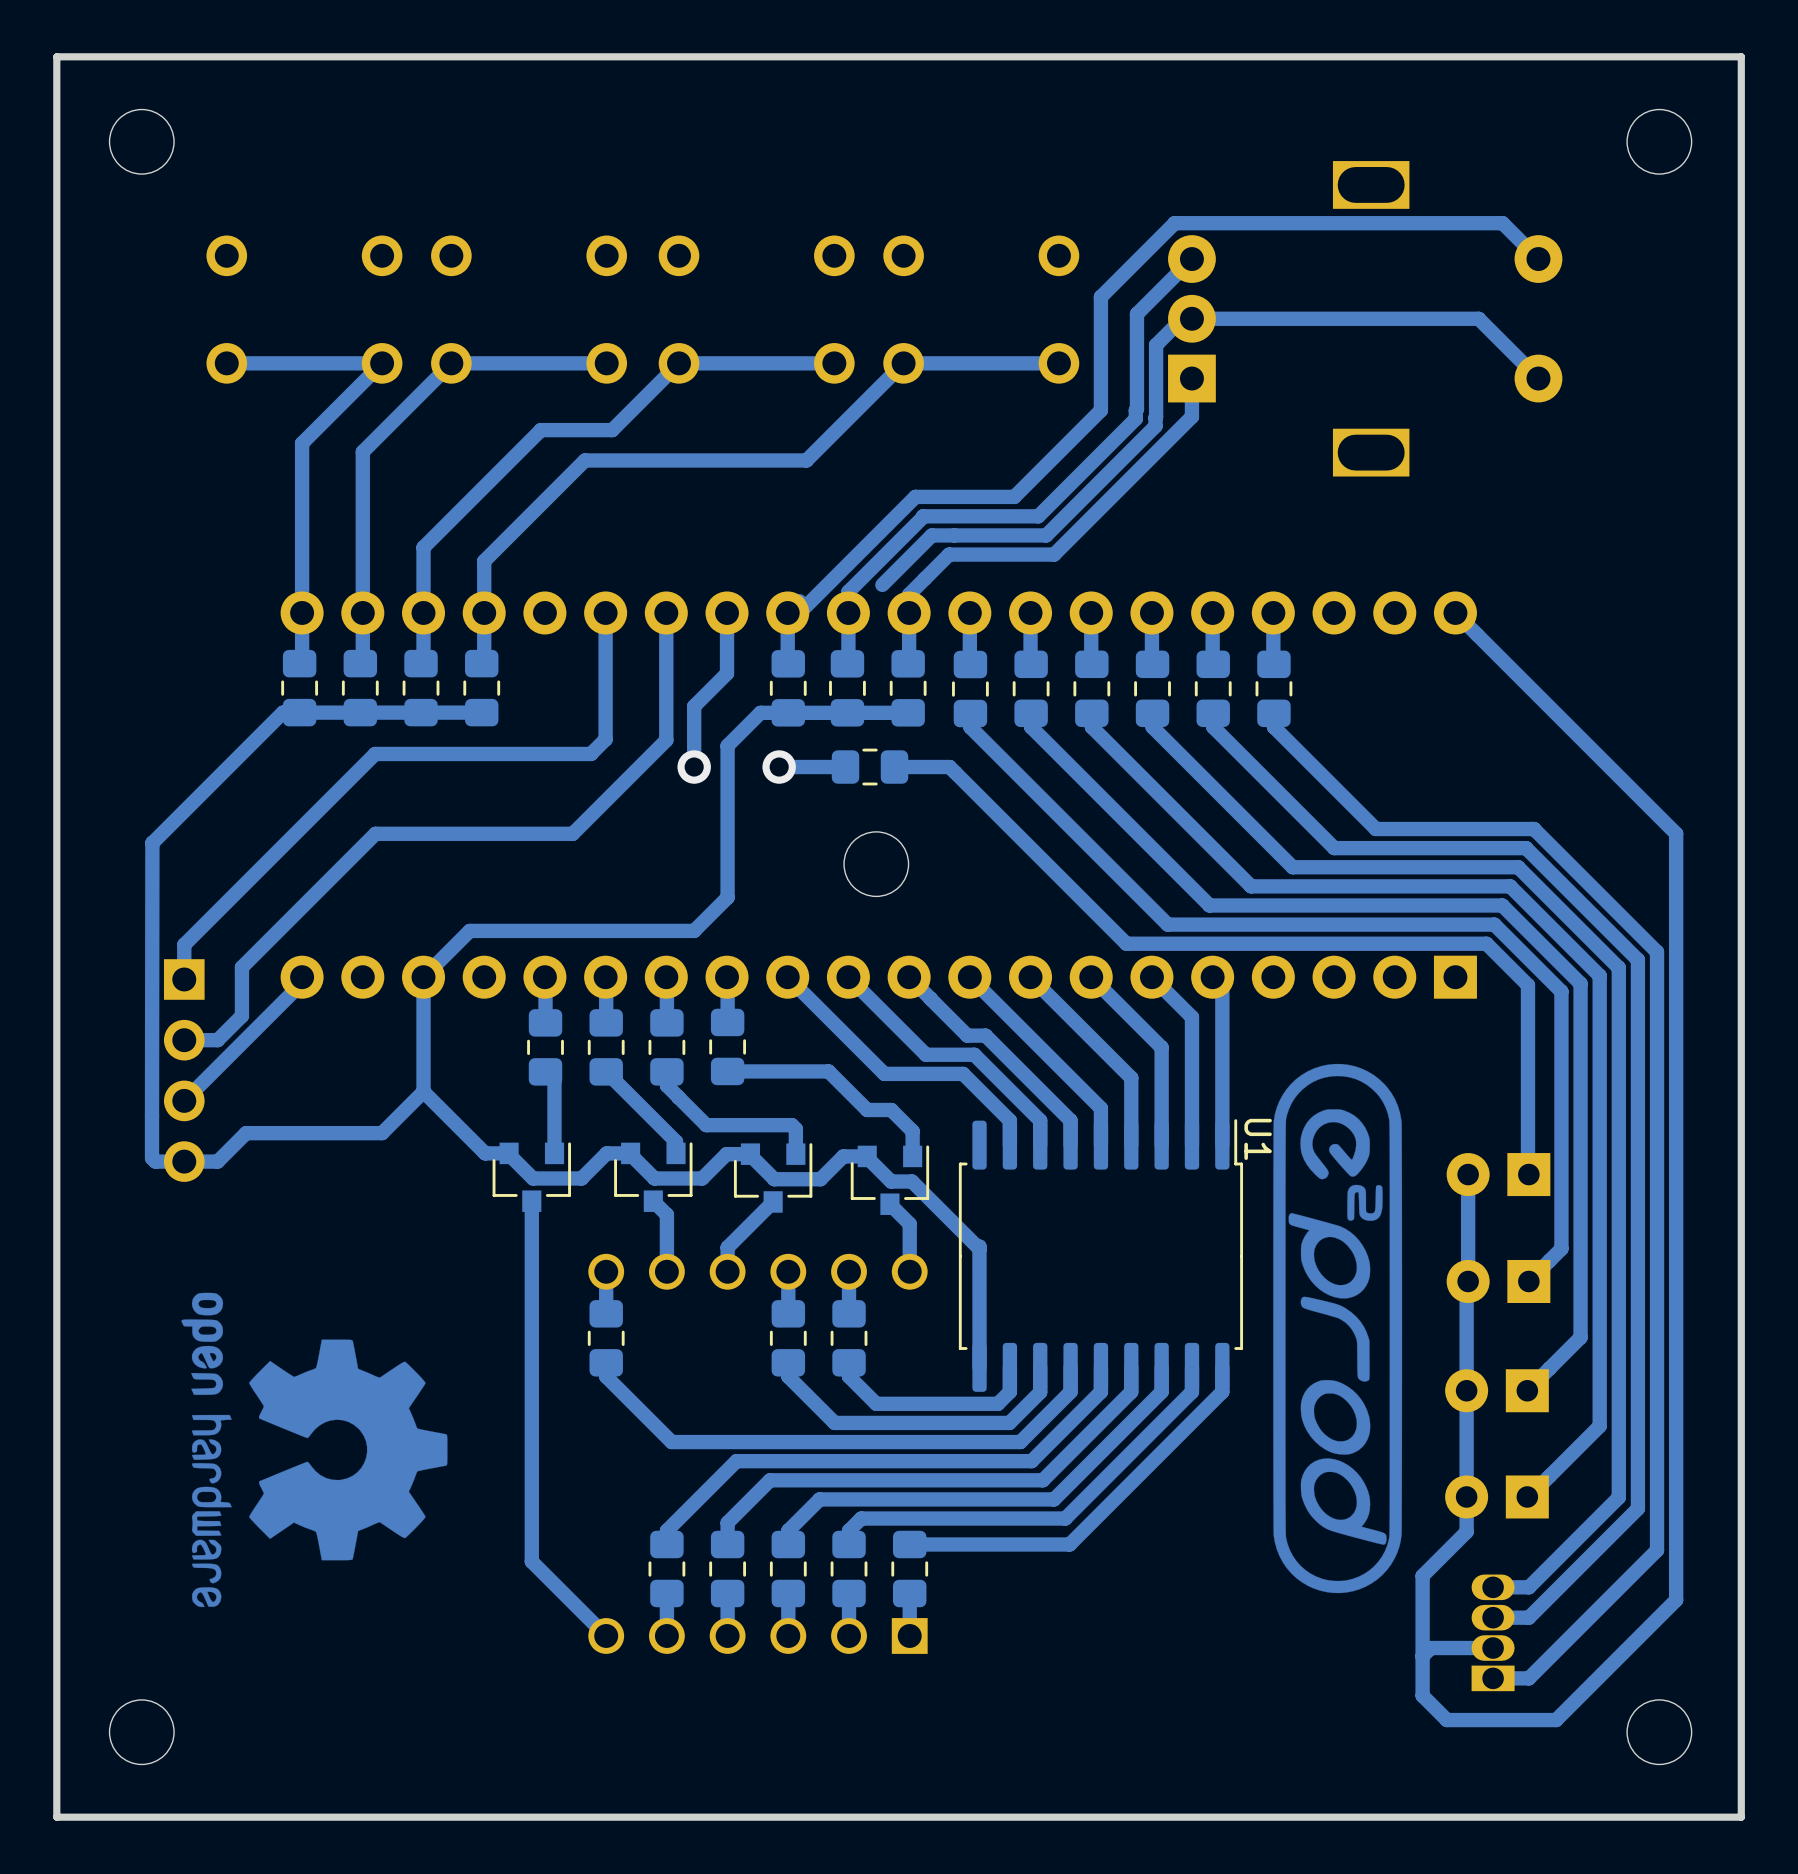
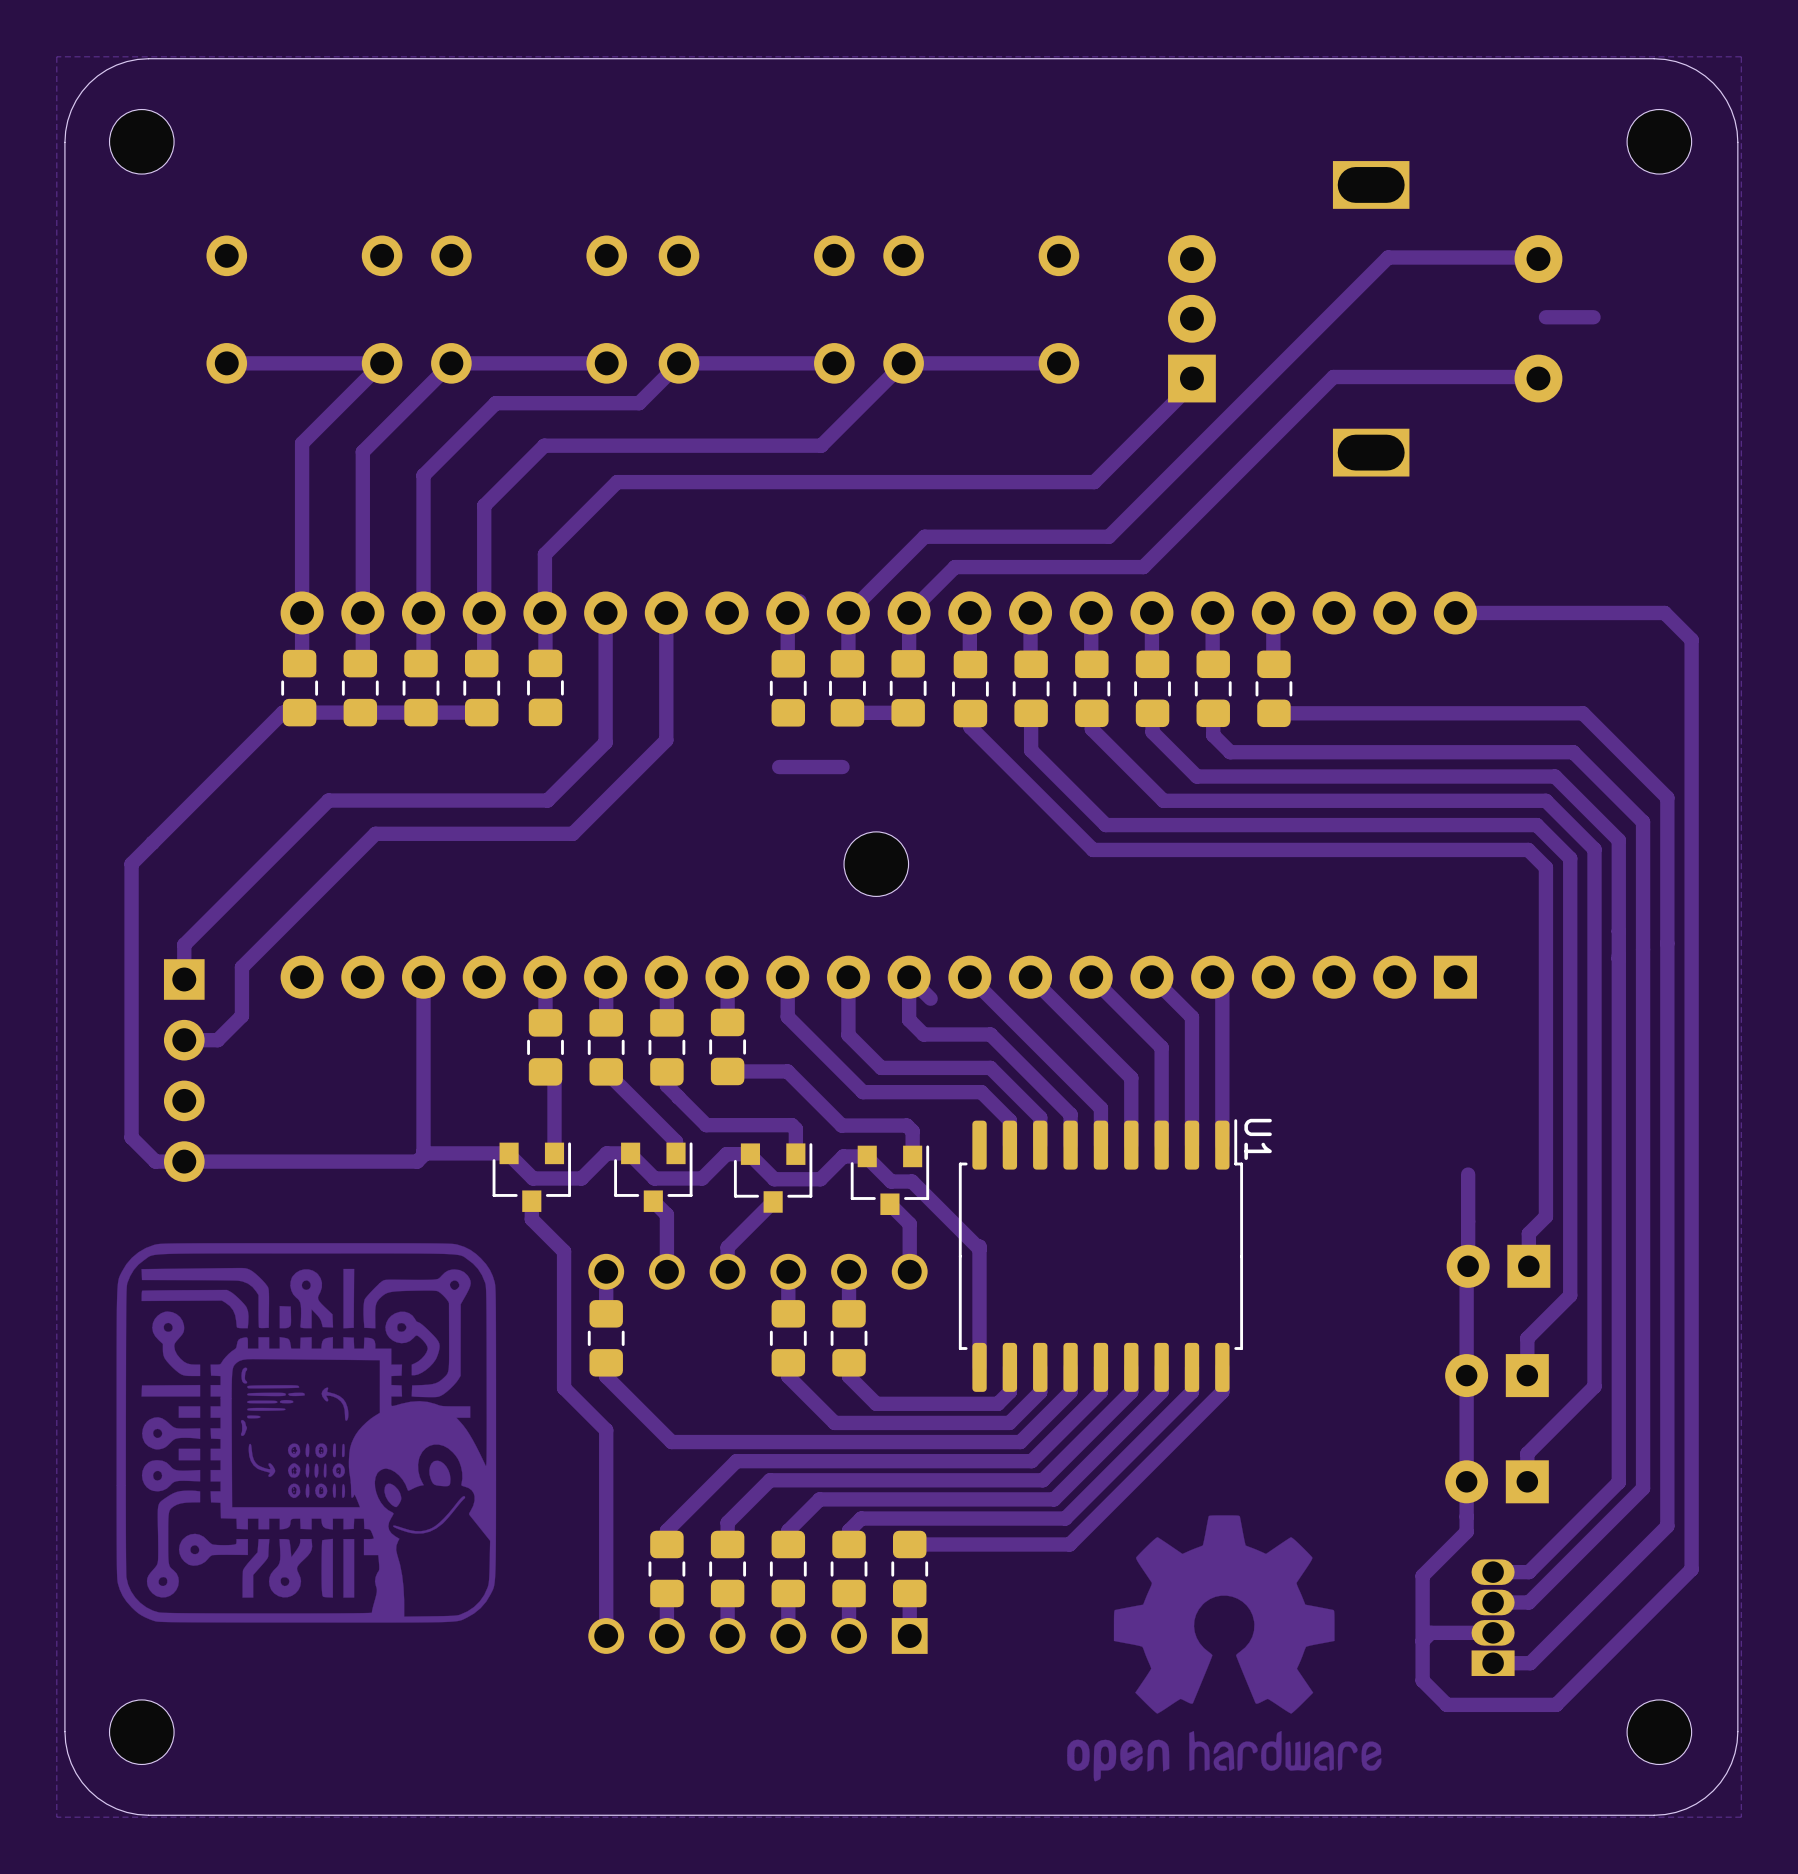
board edge: (1741, 56) (56, 56) (56, 1817) (1741, 1817) (1741, 56) -> (1654, 58) (1686, 65) (1713, 83) (1731, 110) (1737, 142) (1737, 1731) (1731, 1763) (1713, 1790) (1686, 1808) (1654, 1815) (148, 1815) (116, 1808) (89, 1790) (71, 1763) (64, 1731) (64, 142) (71, 110) (89, 83) (116, 65) (148, 58) (1654, 58)
track: (1191, 259) (1136, 314) (1135, 418) (1038, 516) (923, 516) (848, 591) (848, 612) -> (1545, 257) (1388, 257) (1108, 536) (924, 536) (848, 612)
track: (1538, 259) (1502, 223) (1174, 223) (1100, 297) (1100, 410) (1014, 496) (915, 496) (799, 612) (787, 612) -> none
track: none -> (1593, 317) (1545, 317)
track: none -> (1199, 377) (1094, 482) (617, 482) (544, 554) (545, 663)
track: (1191, 378) (1191, 416) (1054, 554) (949, 554) (909, 594) (909, 612) -> (1545, 377) (1333, 377) (1143, 567) (955, 567) (909, 612)
track: (1538, 378) (1478, 318) (1182, 318) (1156, 345) (1155, 426) (1046, 535) (931, 535) (882, 584) -> none
track: (639, 403) (612, 430) (540, 430) (423, 547) -> (639, 403) (495, 403) (423, 475) (423, 547)
track: (821, 445) (806, 460) (584, 460) (484, 561) -> (821, 445) (544, 445) (484, 505) (484, 561)
track: (727, 612) (727, 673) (694, 706) (694, 767) -> none
track: (1455, 612) (1676, 833) (1676, 1600) (1556, 1720) (1446, 1720) (1422, 1695) (1422, 1680) -> (1455, 612) (1664, 612) (1691, 639) (1691, 1569) (1556, 1704) (1446, 1704) (1422, 1680)
track: (847, 712) (760, 712) (727, 745) (727, 897) (694, 930) (469, 930) (423, 977) -> none
track: (1273, 713) (1273, 727) (1375, 829) (1534, 829) (1657, 952) (1657, 1550) (1528, 1678) (1493, 1678) -> (1273, 713) (1582, 713) (1667, 797) (1667, 1526) (1530, 1663) (1493, 1663)
track: (1031, 727) (1209, 905) (1502, 905) (1580, 983) (1580, 1337) (1527, 1390) -> (1031, 727) (1031, 750) (1105, 825) (1536, 825) (1570, 858) (1570, 1295) (1527, 1338) (1527, 1375)
track: (1091, 727) (1251, 886) (1510, 886) (1599, 975) (1599, 1426) (1527, 1497) -> (1091, 727) (1163, 800) (1545, 800) (1594, 849) (1594, 1386) (1527, 1453) (1527, 1481)
track: (1152, 727) (1292, 867) (1518, 867) (1618, 967) -> (1152, 727) (1152, 732) (1196, 776) (1555, 776) (1618, 840) (1618, 967)
track: (1213, 727) (1334, 848) (1526, 848) (1637, 959) (1637, 1508) (1528, 1617) (1493, 1617) -> (1213, 727) (1213, 735) (1230, 752) (1573, 752) (1643, 822) (1643, 1488) (1528, 1602) (1493, 1602)
track: (605, 739) (590, 753) (375, 753) (328, 800) -> (605, 739) (605, 742) (547, 800) (328, 800)
via: (694, 767) -> none
via: (779, 767) -> none
part rotation: 0° (870, 767) -> 90° clockwise (545, 687)
part position: (870, 767) -> (545, 687)
track: (894, 767) (949, 767) (1126, 943) (1486, 943) (1527, 985) (1528, 1174) -> none
track: (152, 842) (152, 1158) -> (152, 842) (131, 863) (131, 1137) (152, 1158)
track: (1093, 849) (1167, 924) (1494, 924) (1561, 991) (1561, 1248) (1527, 1282) -> (1093, 849) (1528, 849) (1545, 867) (1545, 1216) (1528, 1233) (1528, 1266)
track: (307, 977) (184, 1100) -> none
track: (787, 977) (884, 1073) (963, 1073) (981, 1092) -> (787, 977) (787, 1016) (863, 1092) (981, 1092)
track: (848, 977) (925, 1054) (974, 1054) (1040, 1120) -> (848, 977) (848, 1035) (881, 1067) (990, 1067) (1040, 1117) (1040, 1120)
track: (930, 998) (967, 1035) (985, 1035) (1070, 1120) -> (909, 977) (909, 1019) (923, 1034) (990, 1034) (1070, 1114) (1070, 1120)
drawing: [1273, 1063, 1403, 1594] -> none
track: (787, 1071) (828, 1071) (867, 1110) (891, 1110) (906, 1125) -> (787, 1071) (841, 1125) (906, 1125)
track: none -> (423, 1091) (423, 1151) (425, 1153)
track: (485, 1153) (423, 1091) (382, 1133) (246, 1133) (217, 1161) -> (425, 1153) (417, 1161) (217, 1161)
track: none -> (485, 1153) (425, 1153)
part: (1498, 1174) -> none
track: (531, 1219) (531, 1561) (606, 1635) -> (531, 1219) (564, 1251) (564, 1388) (606, 1430) (606, 1635)
part position: (1498, 1281) -> (1498, 1266)
drawing shape: [181, 1292, 448, 1608] -> [116, 1243, 497, 1623]
part position: (1496, 1390) -> (1496, 1375)
track: (1618, 1482) (1618, 1497) (1528, 1587) (1493, 1587) -> (1618, 1482) (1528, 1572) (1493, 1572)
part position: (1496, 1496) -> (1496, 1481)
drawing: none -> [1067, 1515, 1382, 1782]
part position: (1493, 1632) -> (1493, 1617)
track: (1493, 1648) (1430, 1648) (1422, 1656) -> (1493, 1632) (1430, 1632) (1422, 1641)

